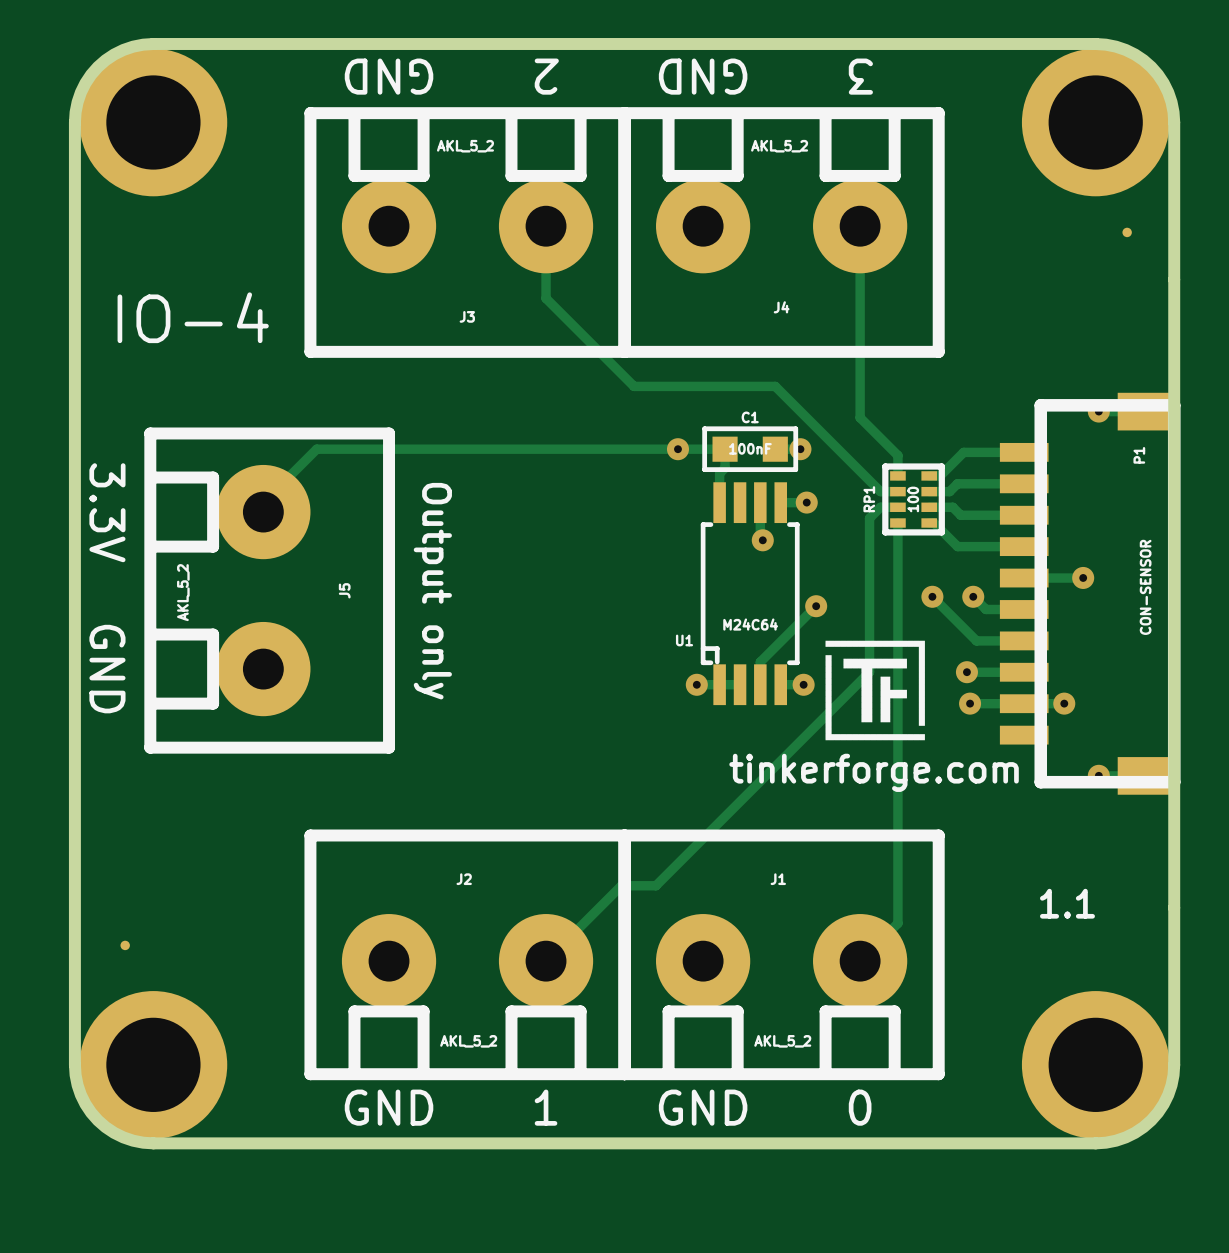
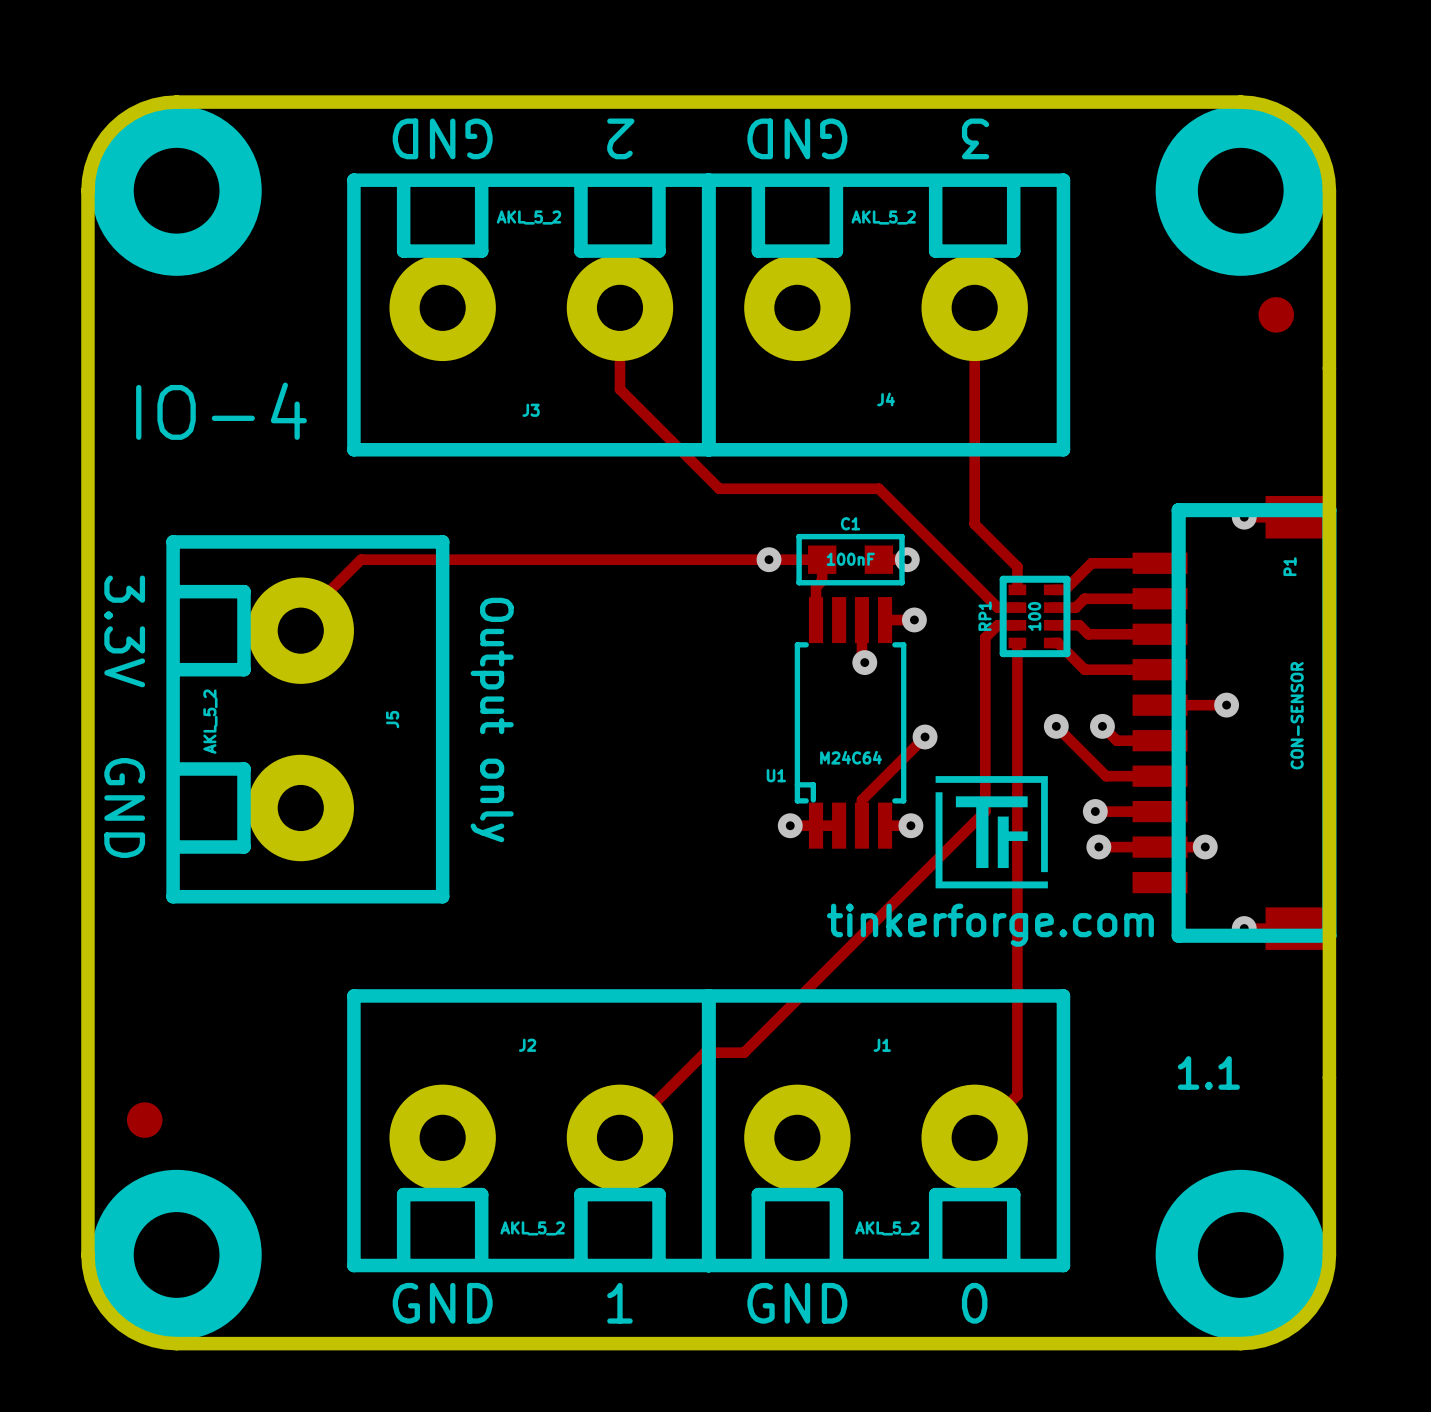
part footprint: [79, 48, 228, 197] -> [91, 105, 262, 276]
part footprint: [1021, 48, 1170, 197] -> [1155, 105, 1326, 276]
part footprint: [1122, 227, 1132, 238] -> [1258, 297, 1295, 333]
part footprint: [120, 940, 130, 951] -> [126, 1102, 163, 1138]
part footprint: [79, 991, 228, 1139] -> [91, 1169, 262, 1341]
part footprint: [1021, 991, 1170, 1139] -> [1155, 1169, 1326, 1341]

